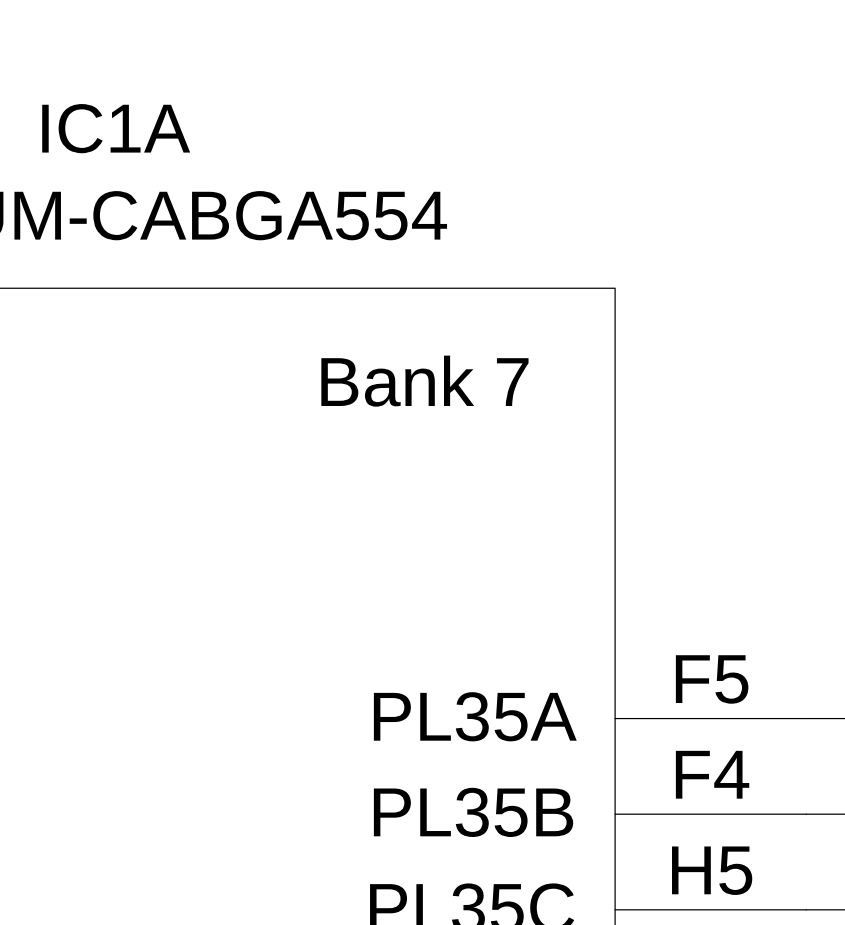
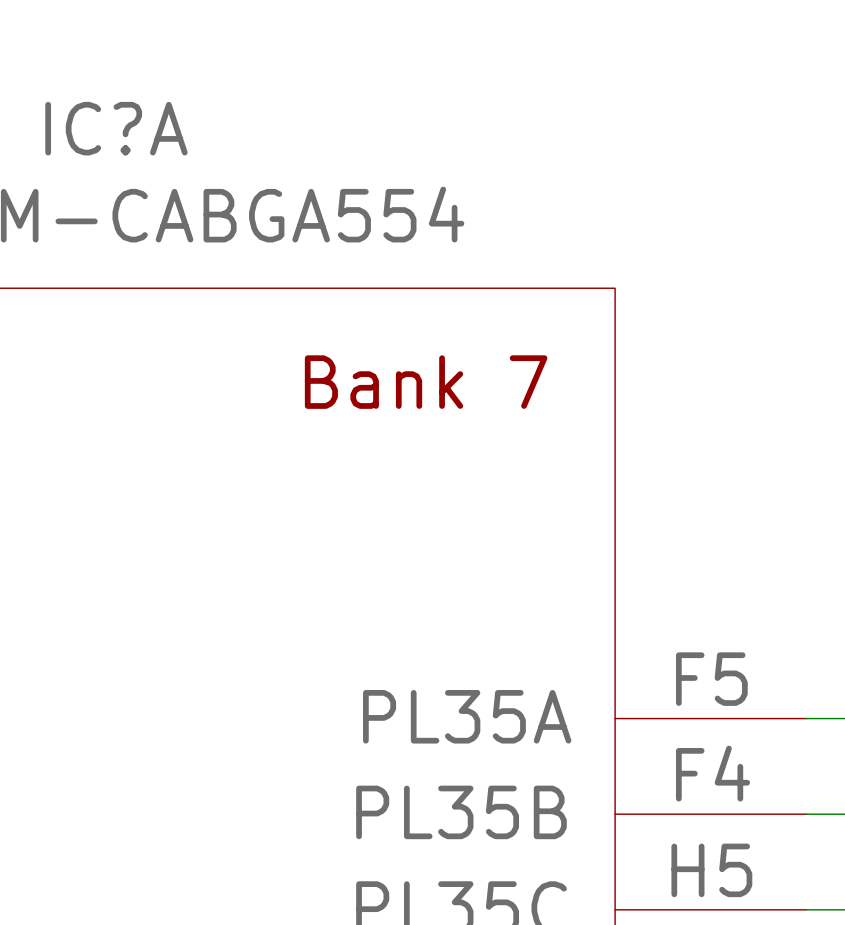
IC1A name: IC1A (116, 128) -> IC?A (116, 128)

